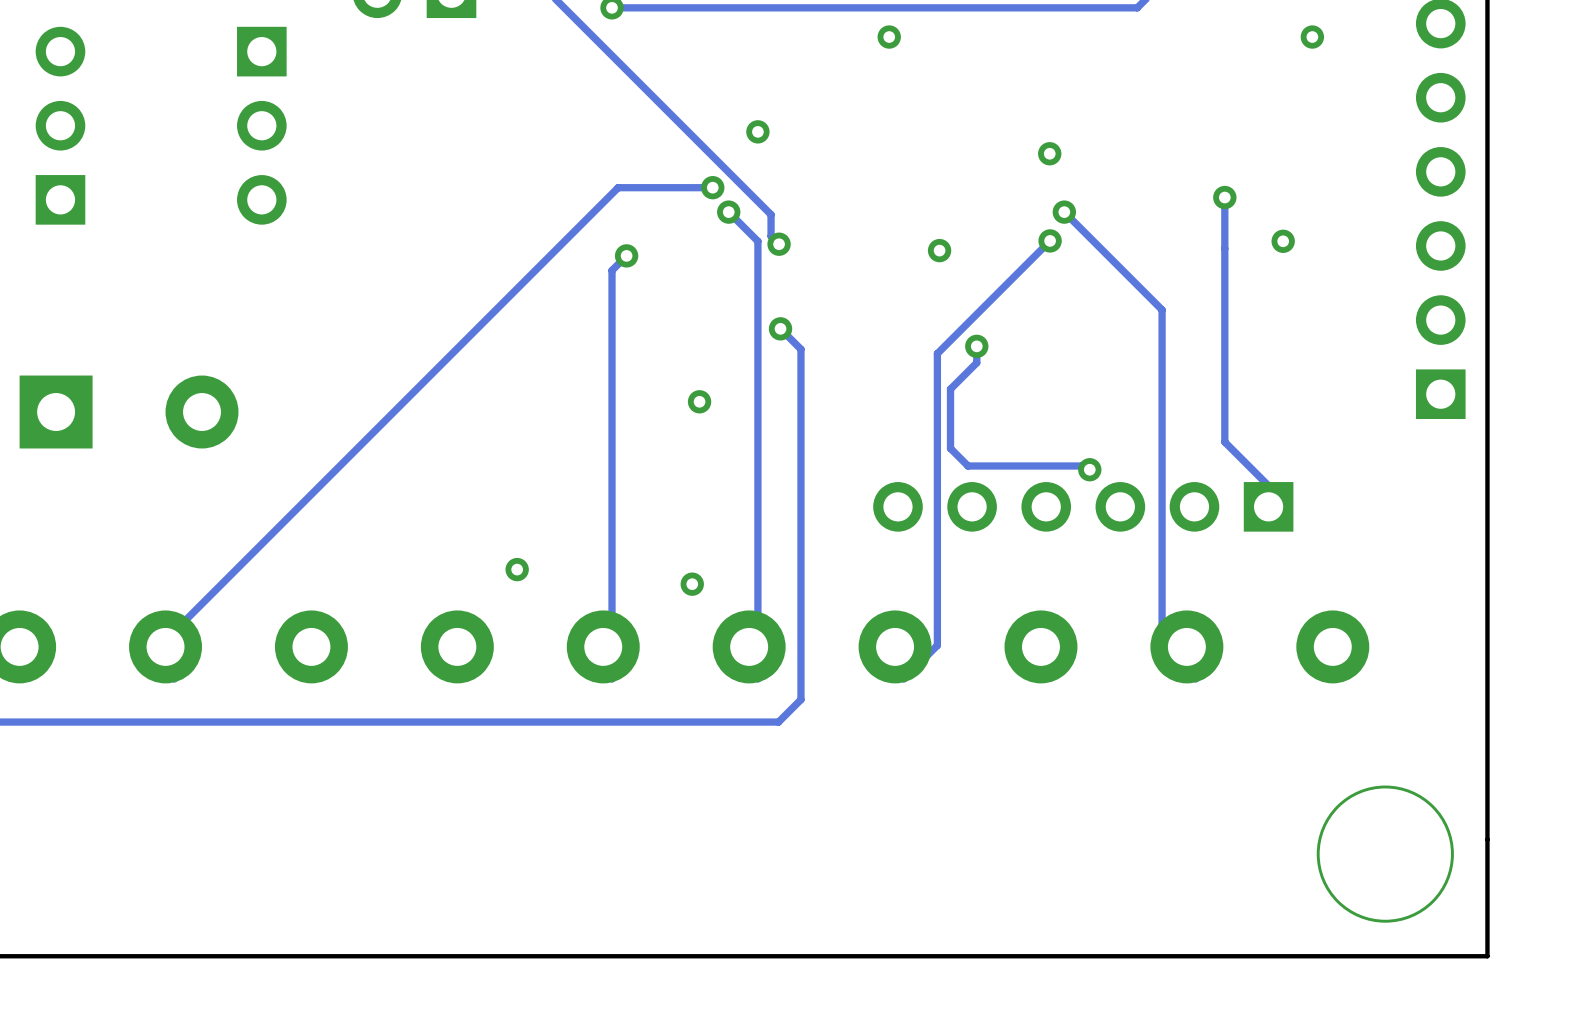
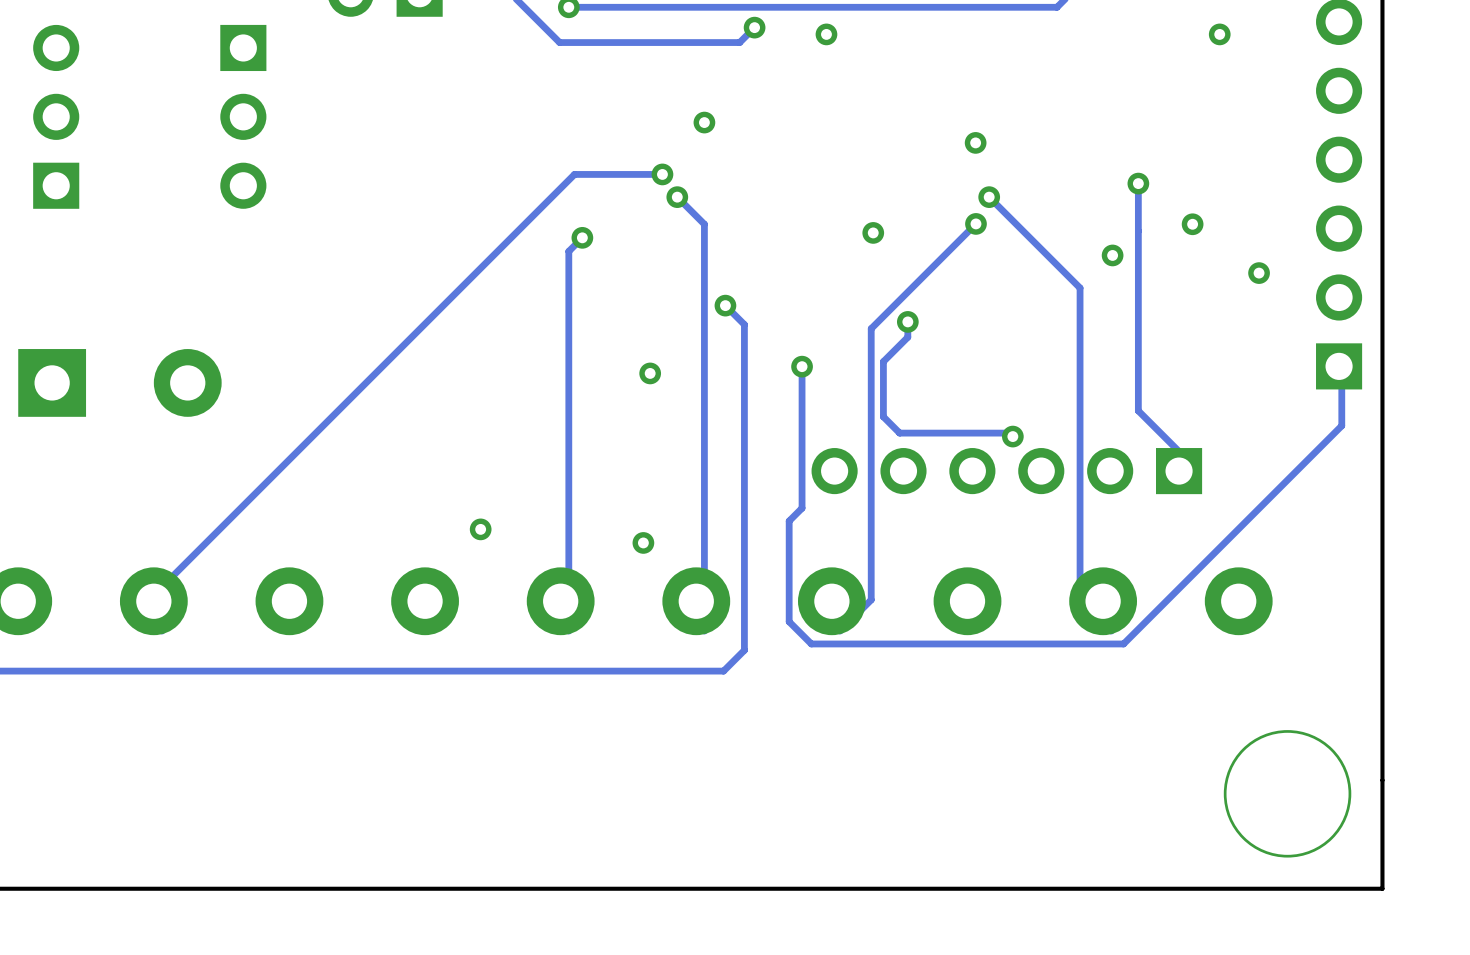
via: none -> (754, 27)
track: (602, 45) (771, 214) (771, 236) (779, 244) -> (559, 42) (739, 42) (754, 27)
via: (779, 244) -> none
via: none -> (1112, 255)
via: none -> (1259, 273)
track: none -> (1341, 359) (1341, 425) (1123, 643) (811, 643) (789, 621) (789, 521) (802, 508) (802, 366)
via: none -> (802, 366)

